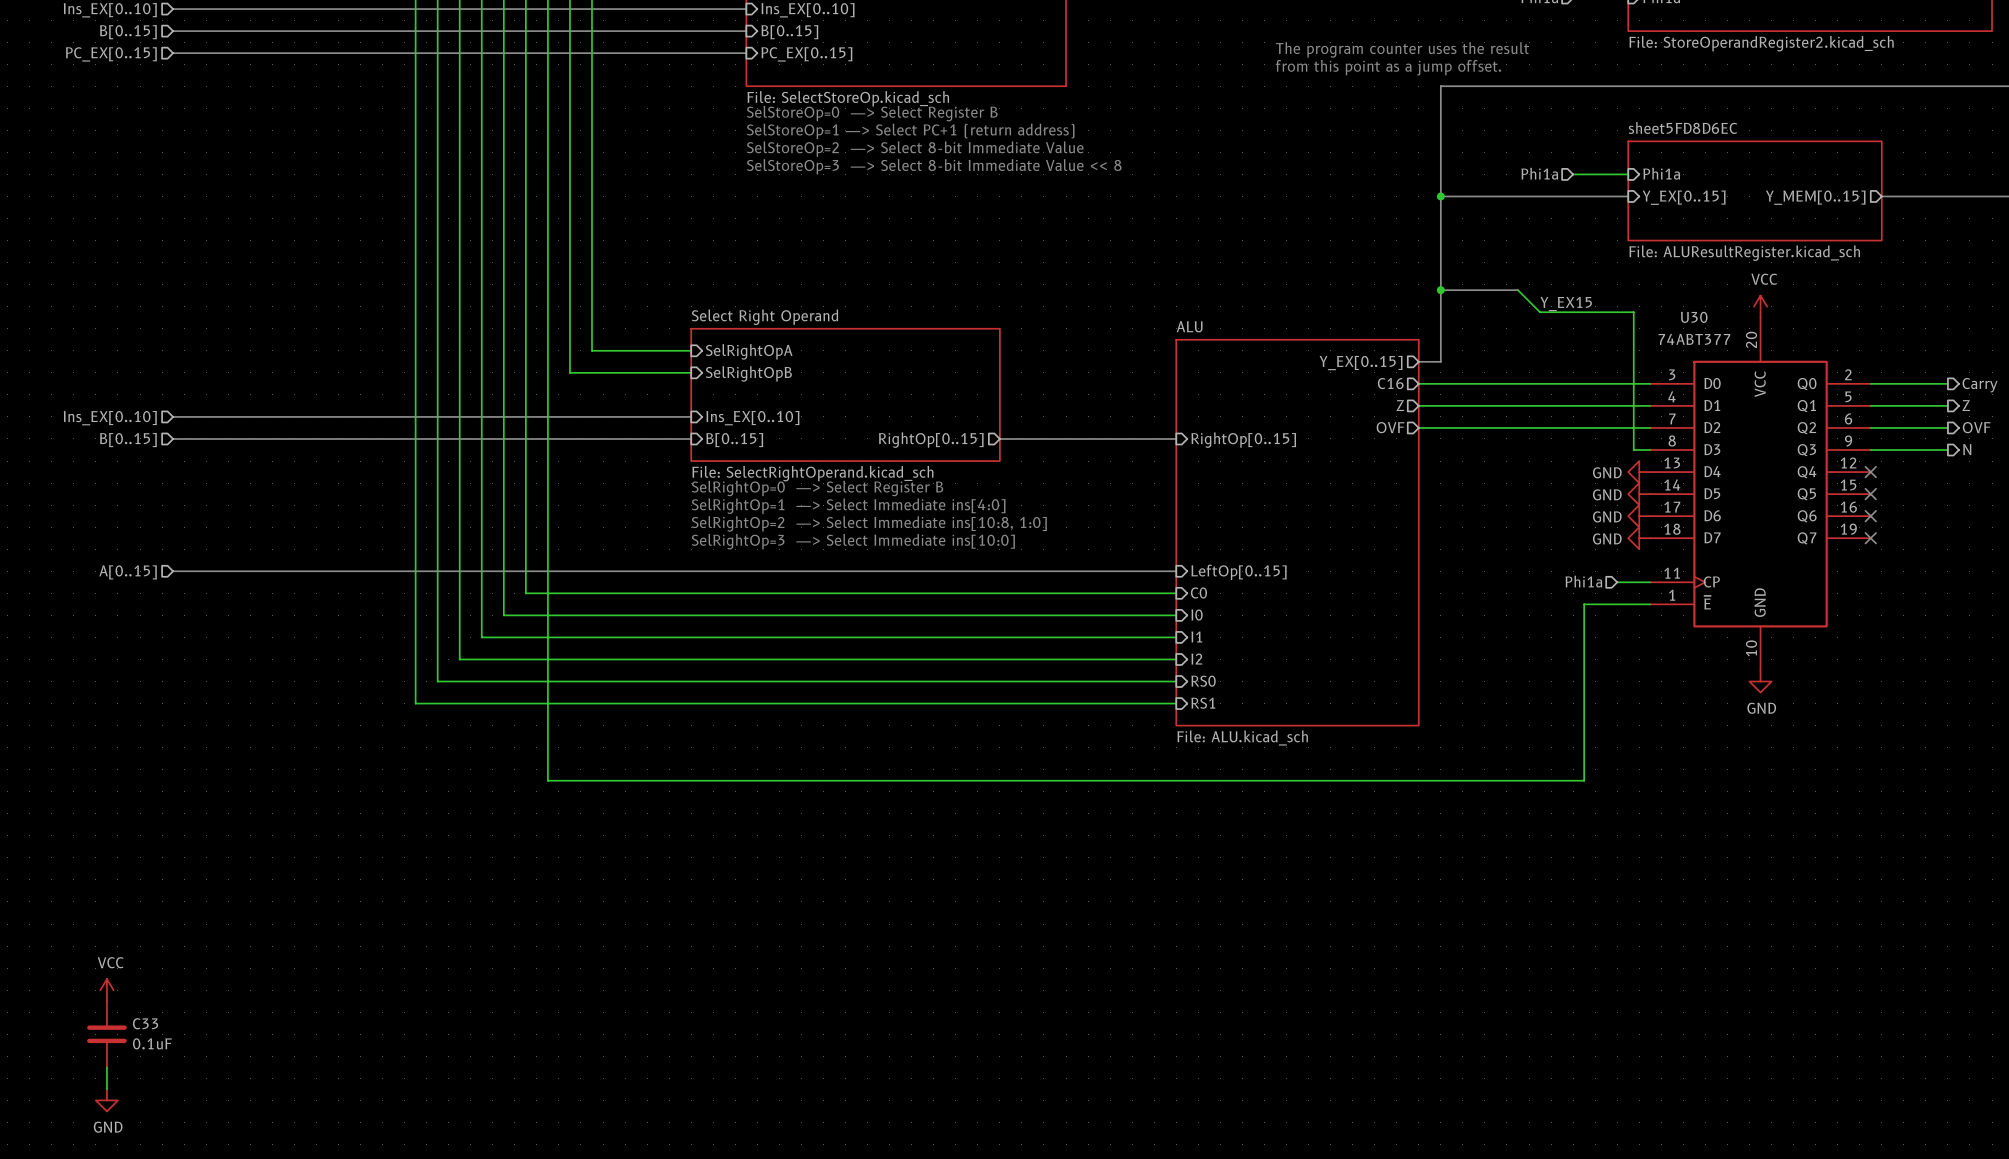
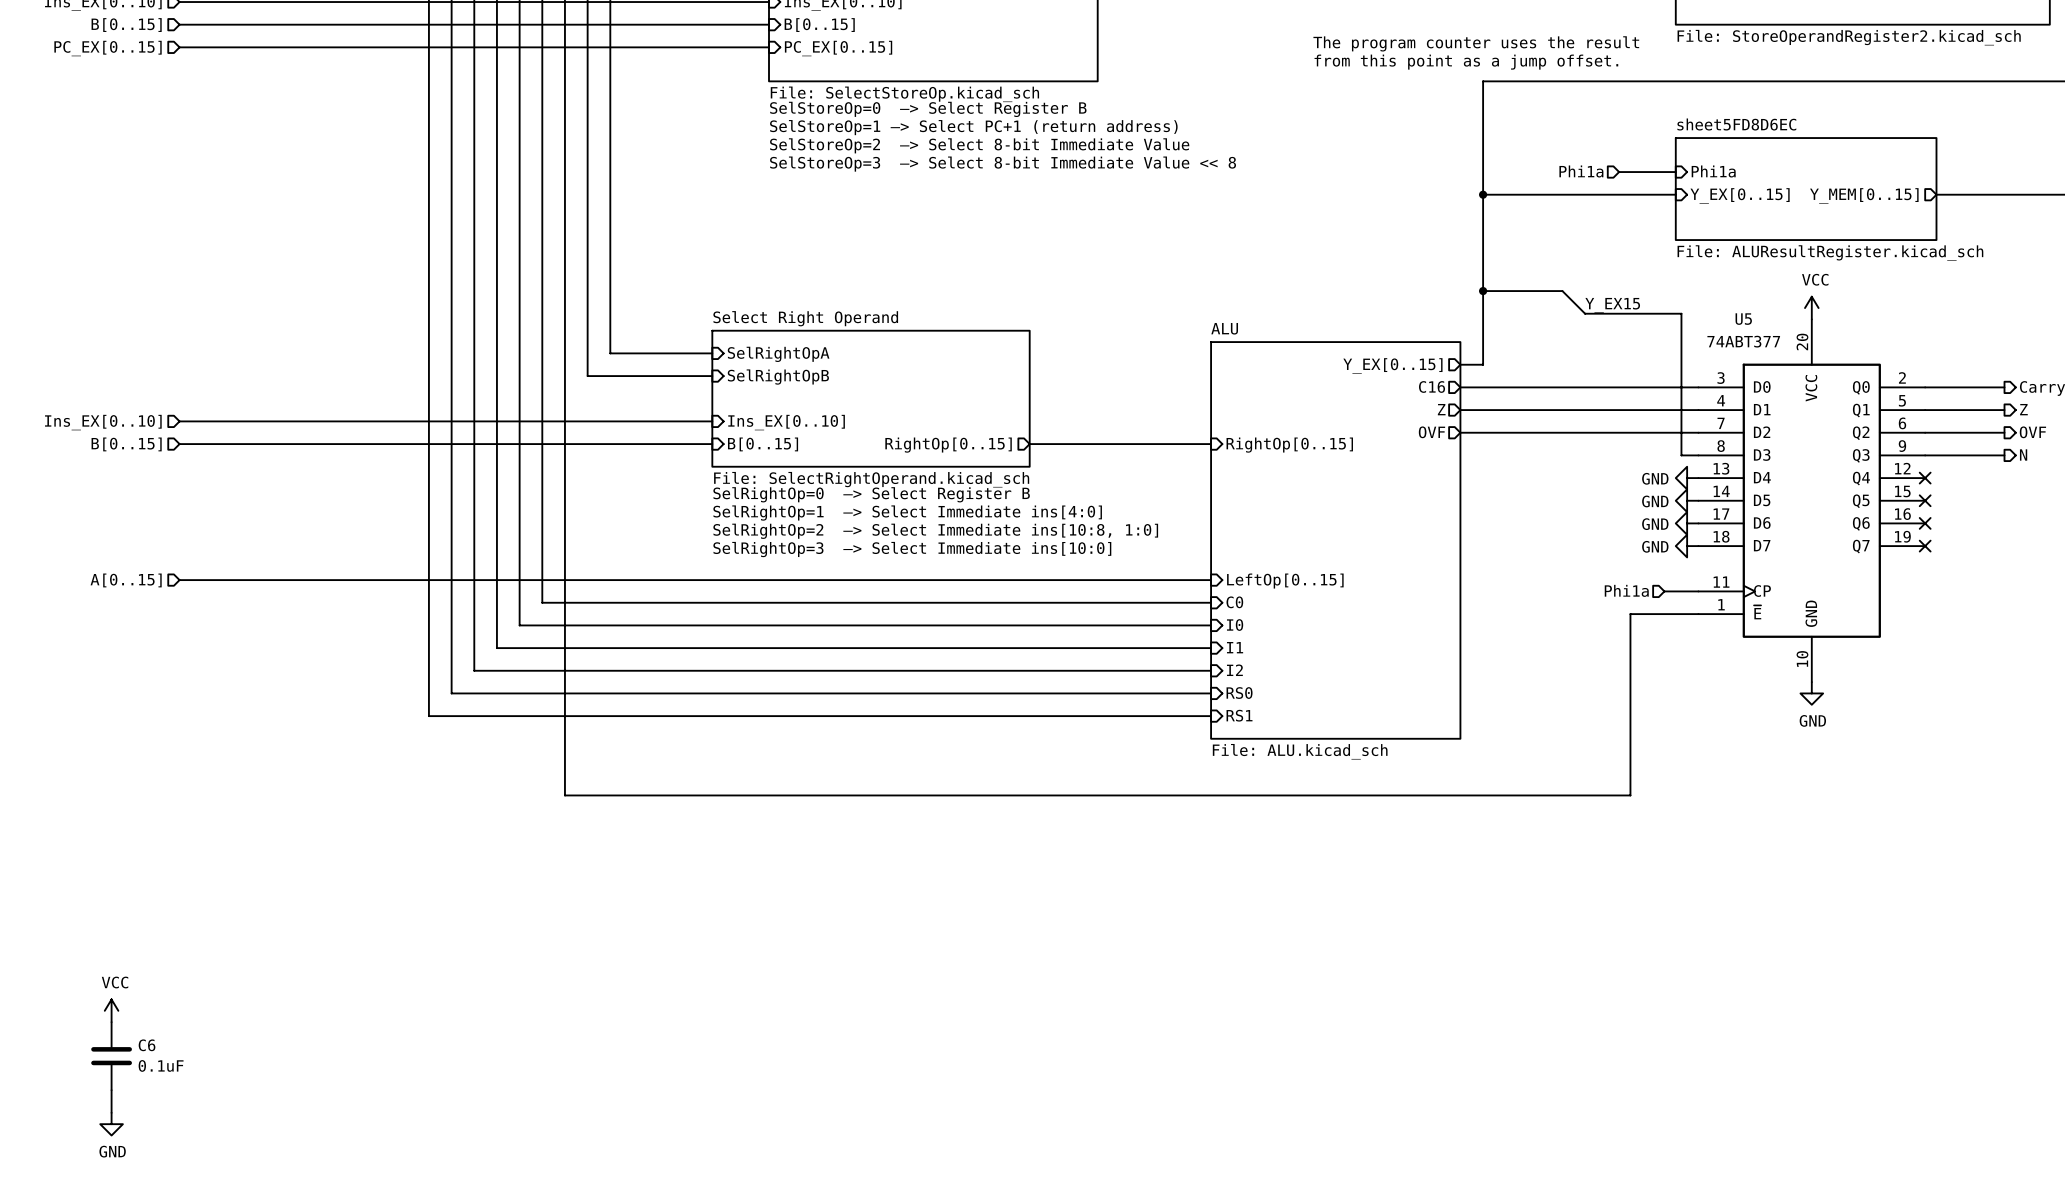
U30 name: U30 (1694, 317) -> U5 (1743, 319)
C33 name: C33 (145, 1023) -> C6 (147, 1045)

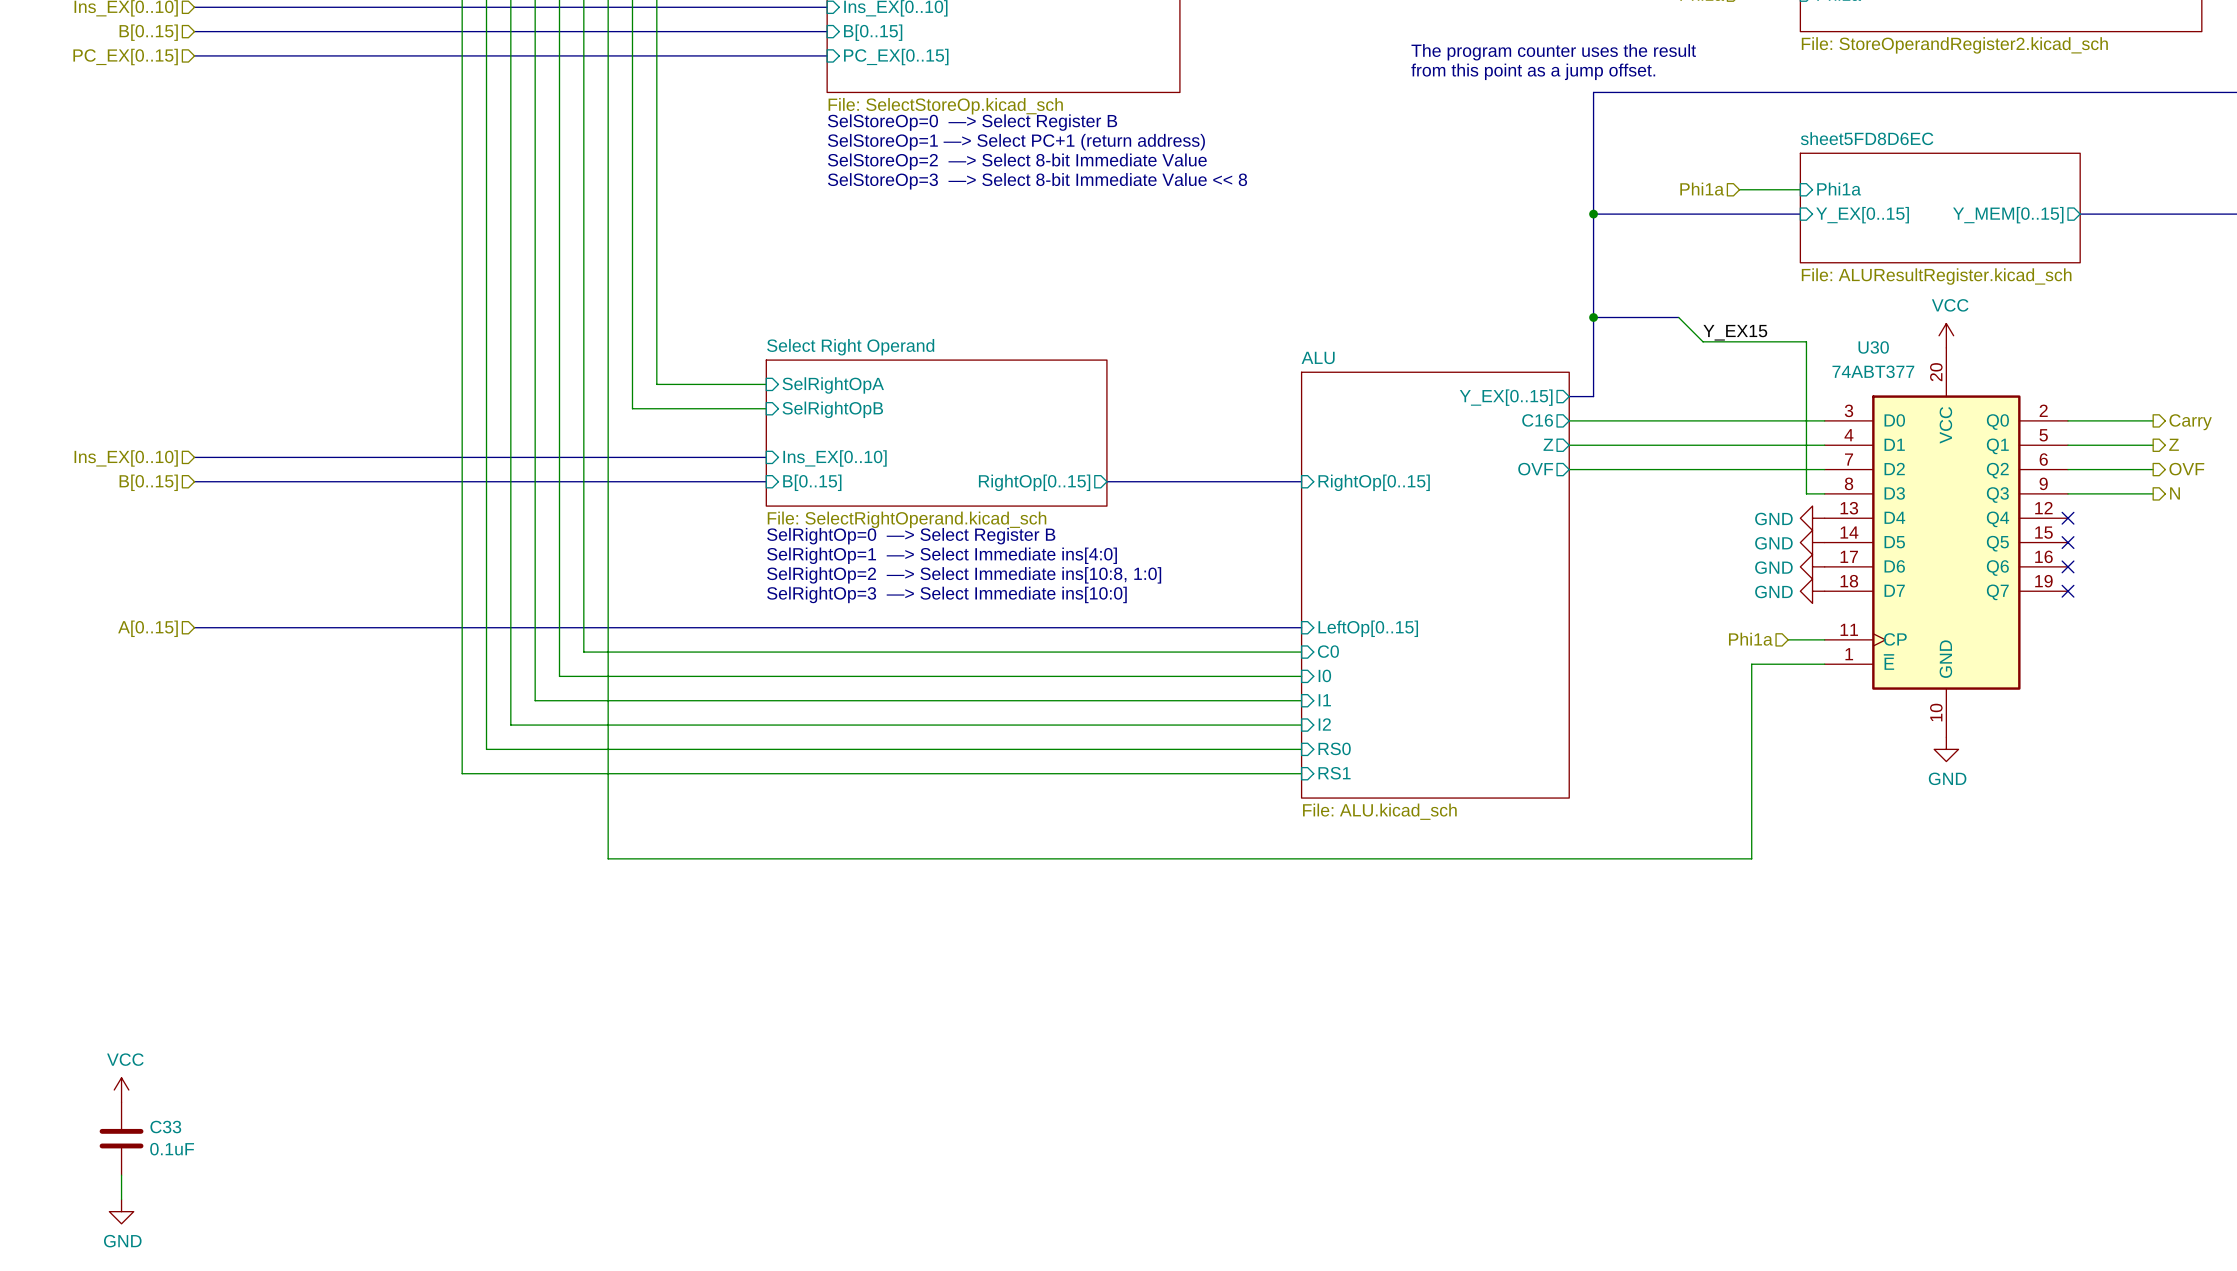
U5 name: U5 (1743, 319) -> U30 (1873, 347)
C6 name: C6 (147, 1045) -> C33 (165, 1127)

